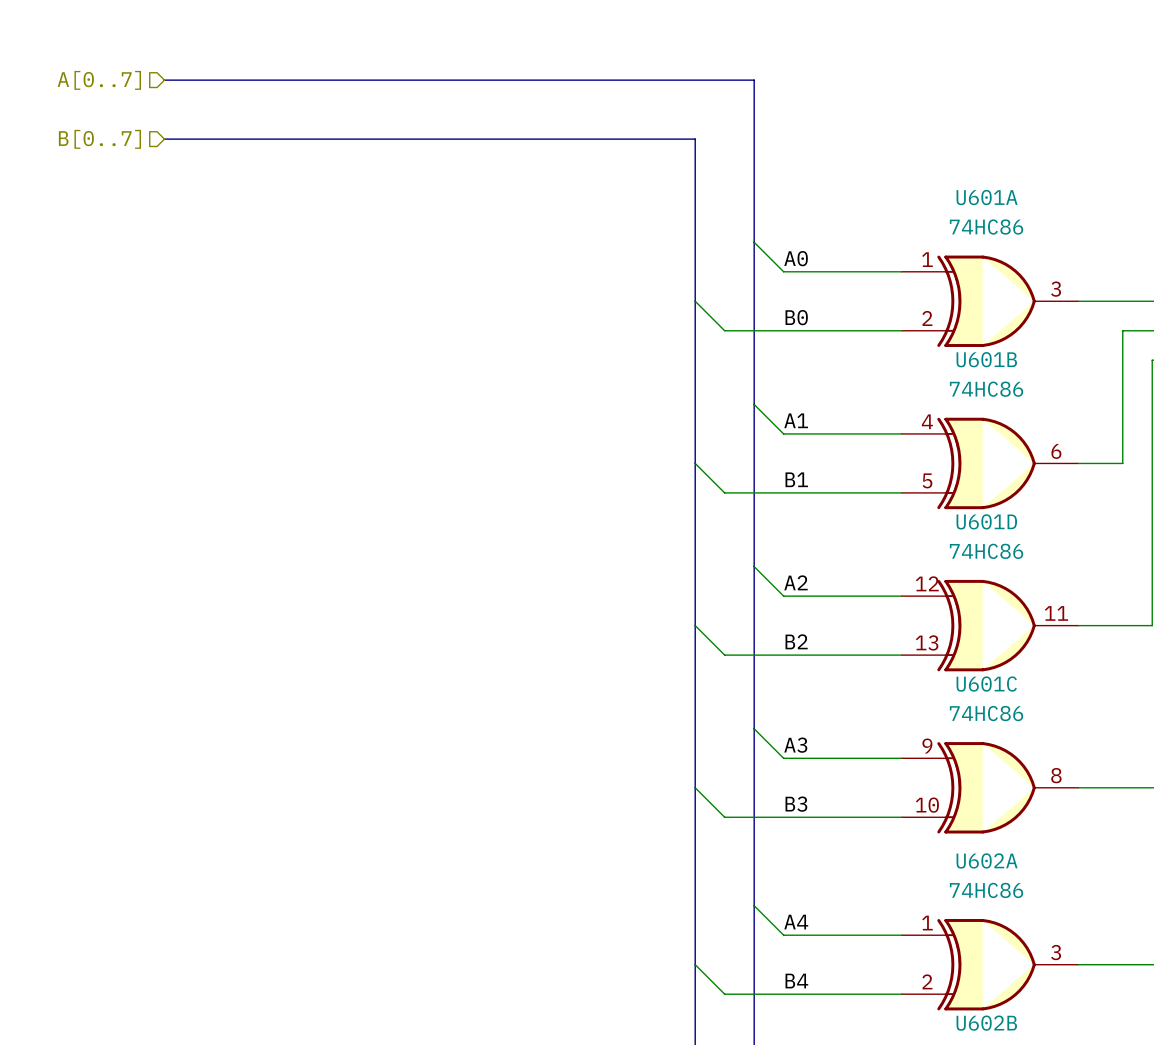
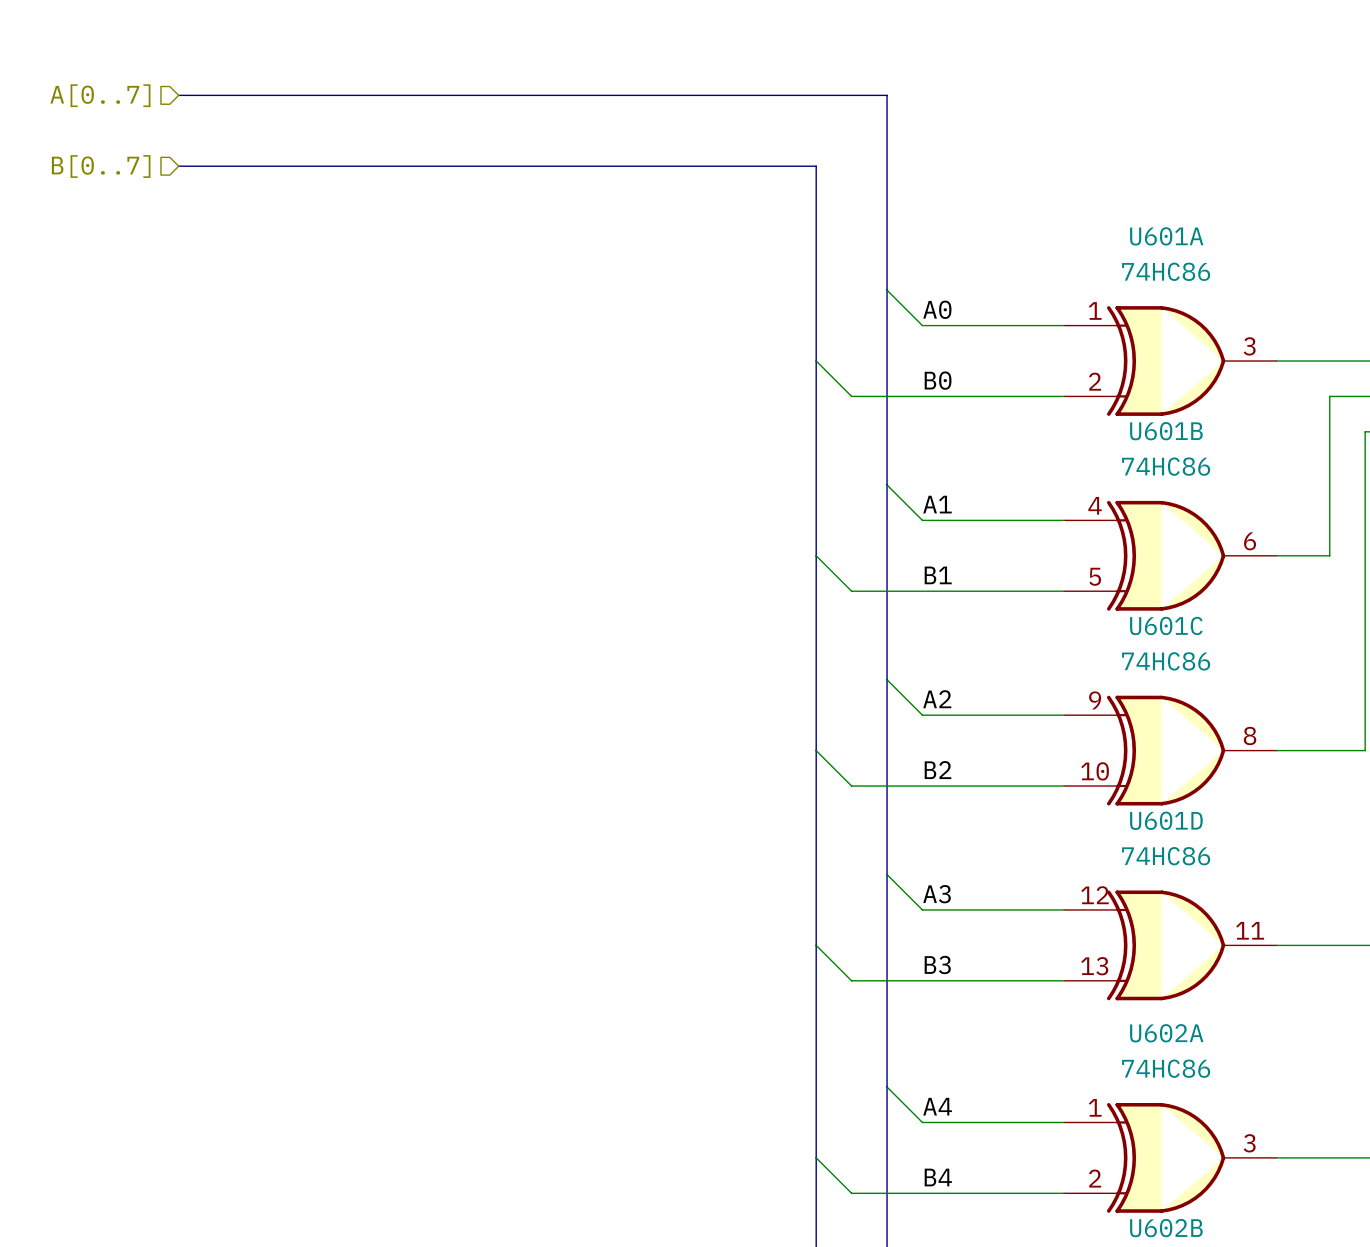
U601D position: (990, 625) -> (1170, 945)
U601C position: (990, 787) -> (1170, 750)

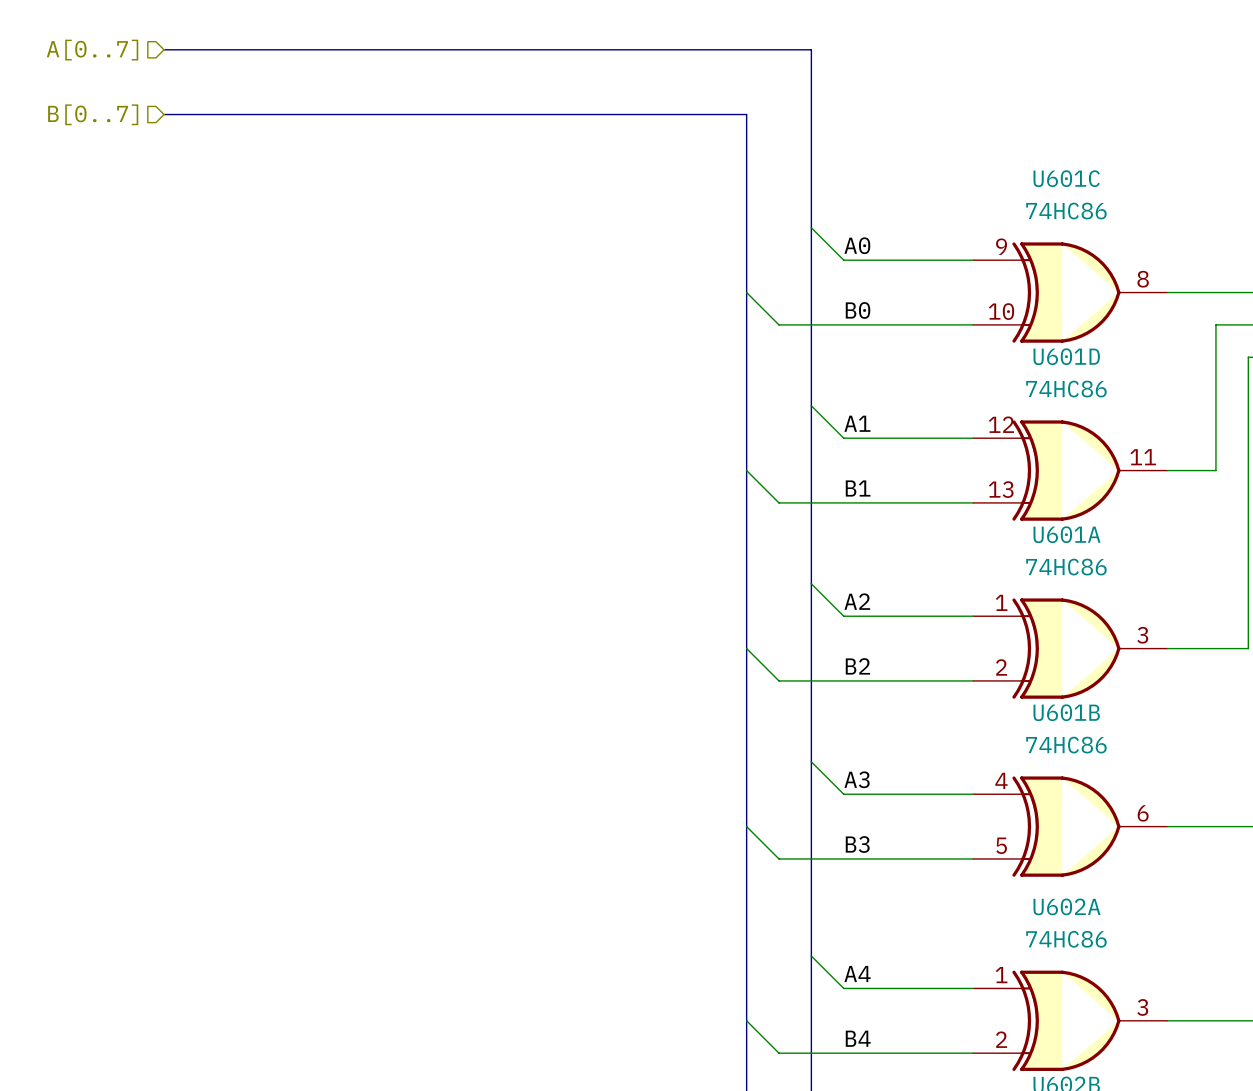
U601A position: (1170, 361) -> (1070, 648)
U601B position: (1170, 555) -> (1070, 826)
U601C position: (1170, 750) -> (1070, 292)
U601D position: (1170, 945) -> (1070, 470)

